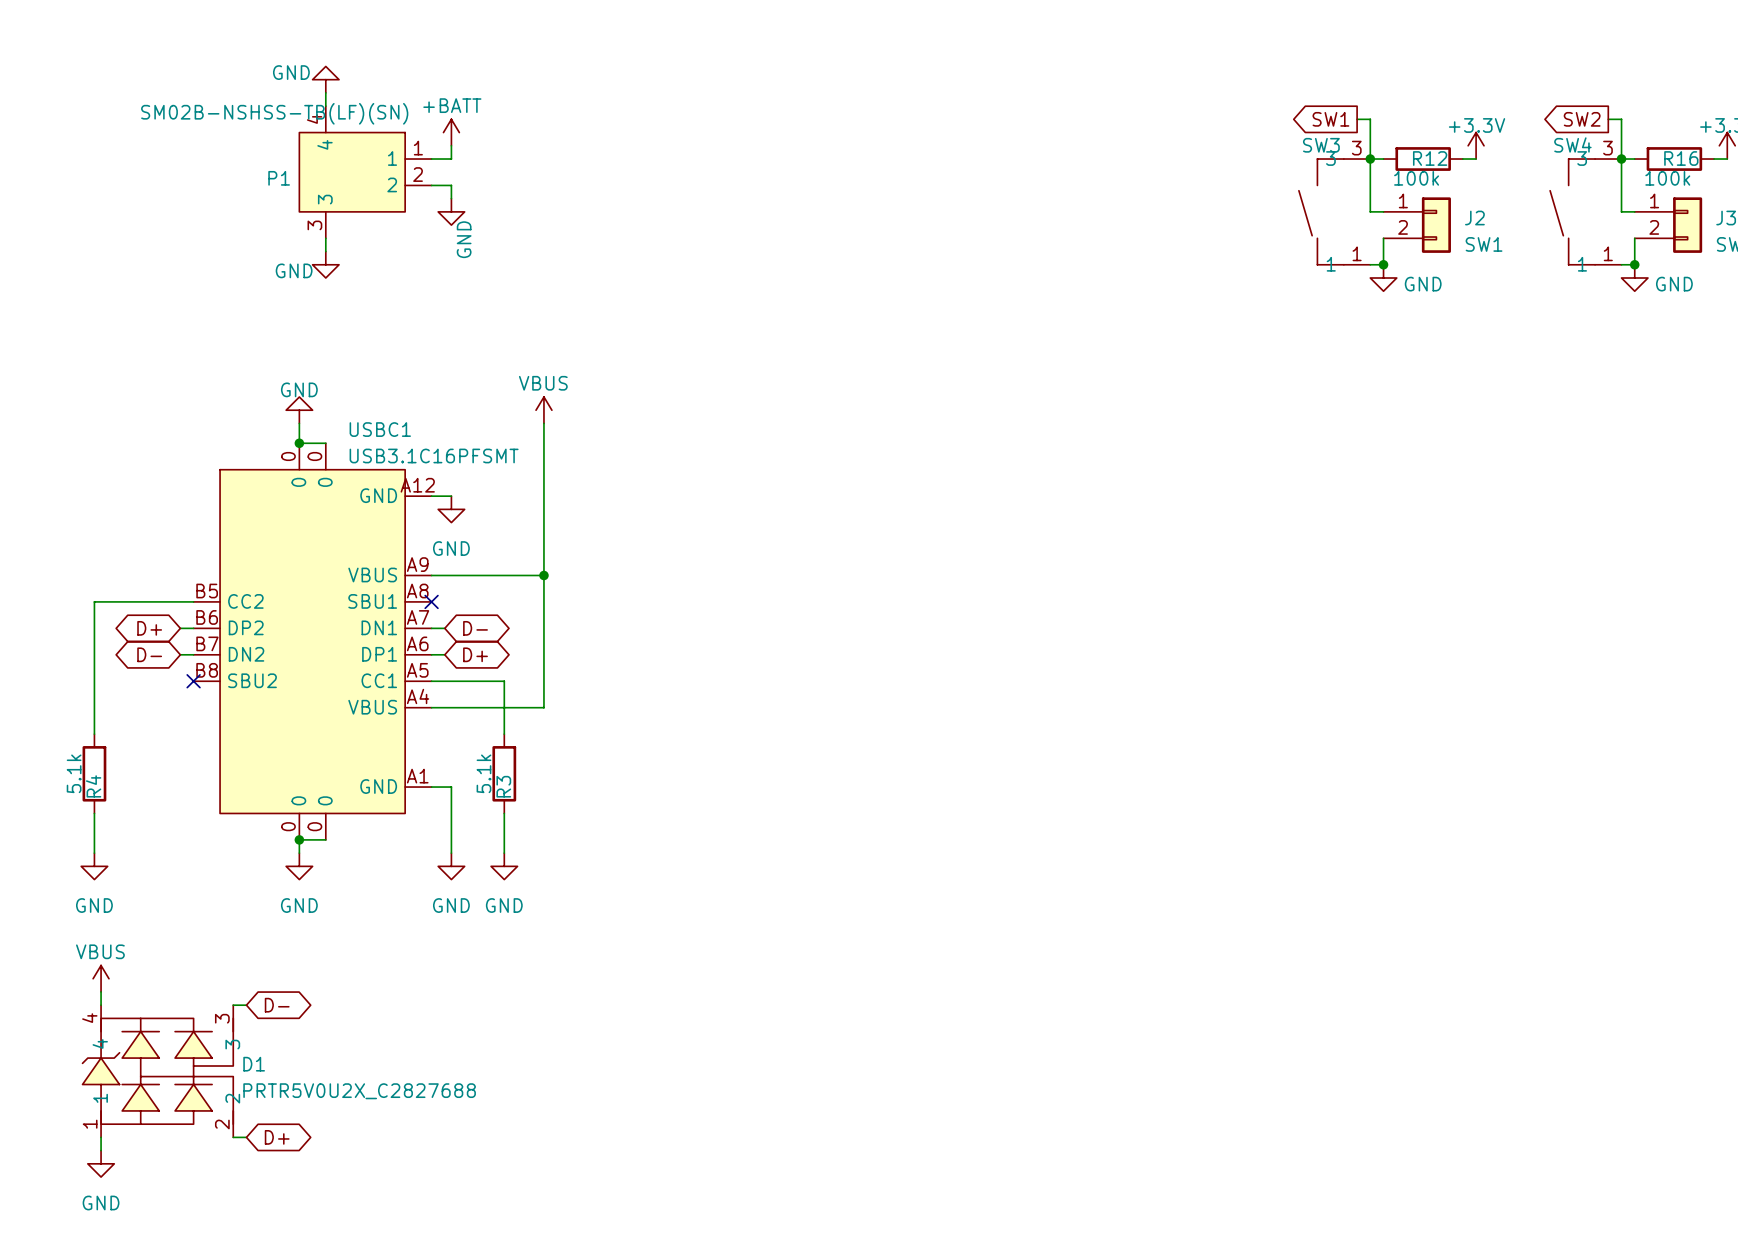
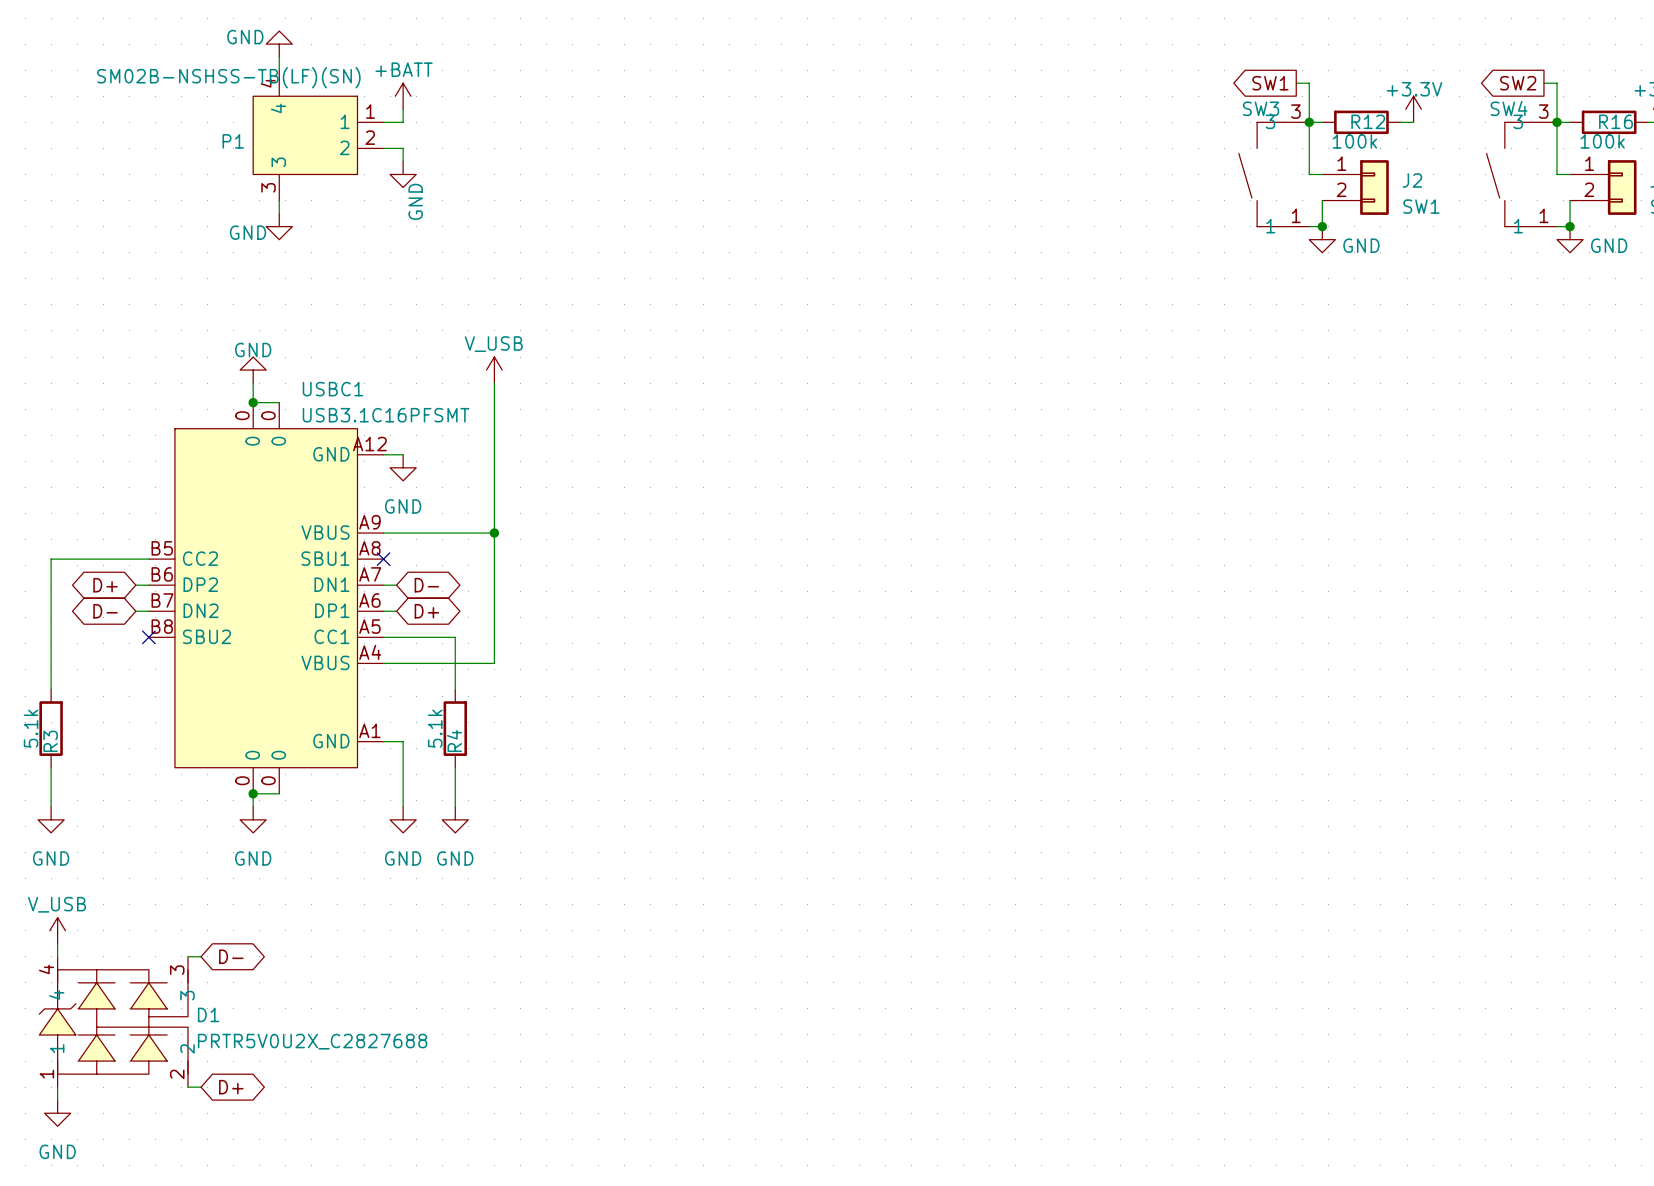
power symbol: VBUS (543, 410) -> V_USB (494, 370)
R4 name: R4 (93, 786) -> R3 (50, 741)
R3 name: R3 (503, 786) -> R4 (454, 741)
power symbol: VBUS (101, 978) -> V_USB (57, 930)

